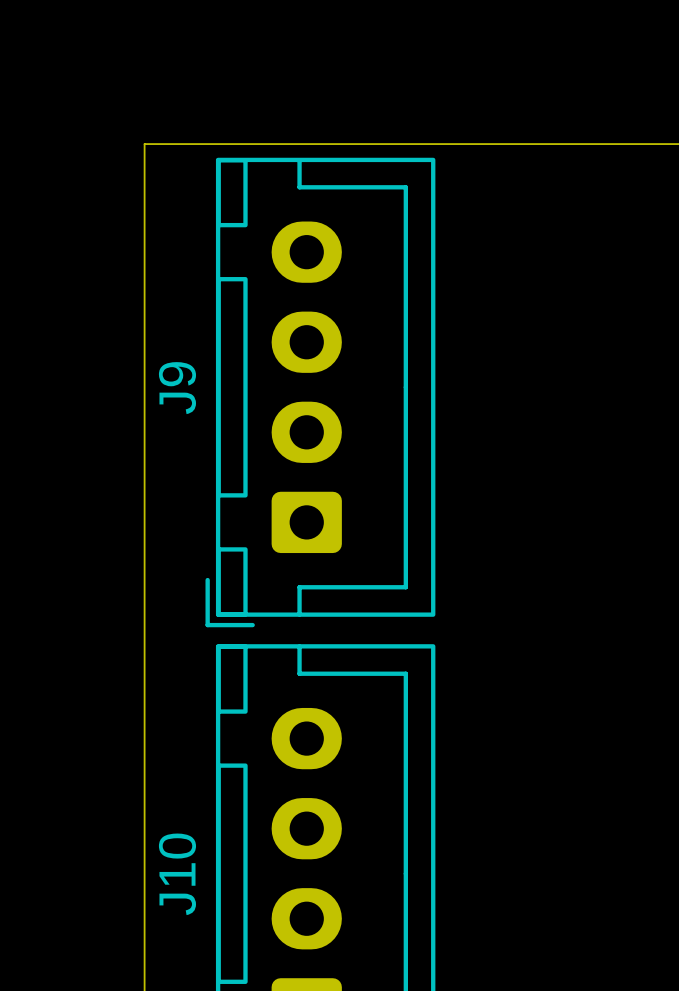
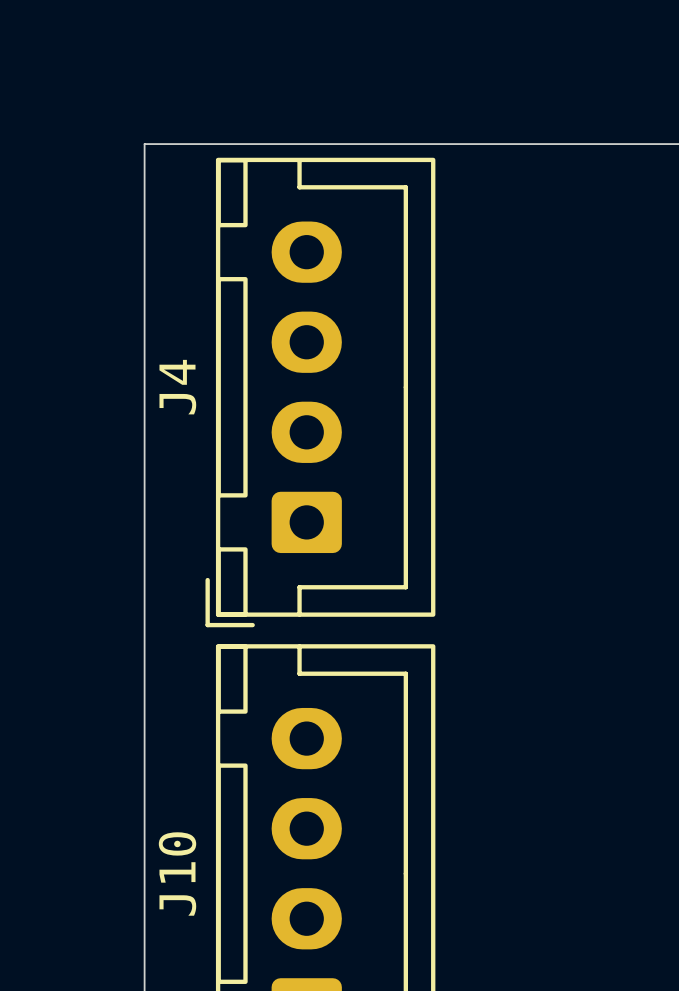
J9 name: J9 (177, 388) -> J4 (177, 387)

